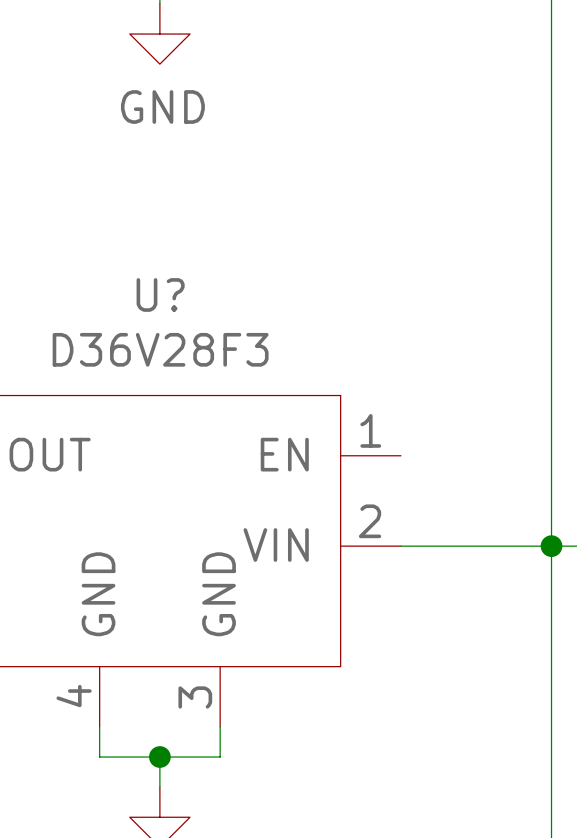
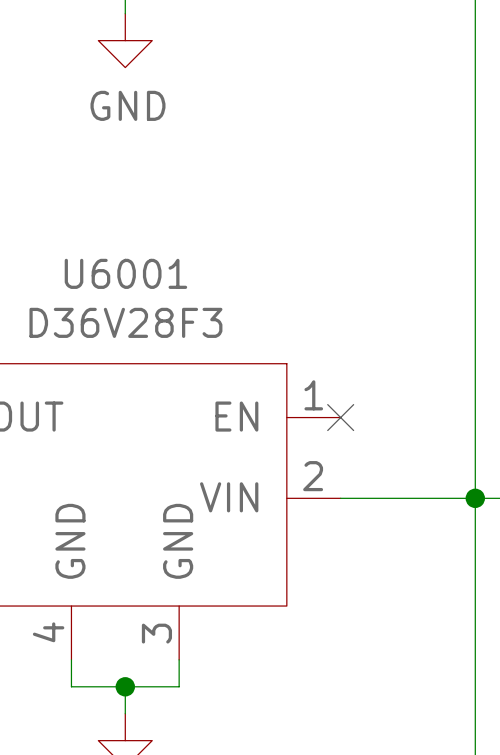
U? name: U? (160, 294) -> U6001 (125, 273)
no-connect mark: none -> (340, 417)

